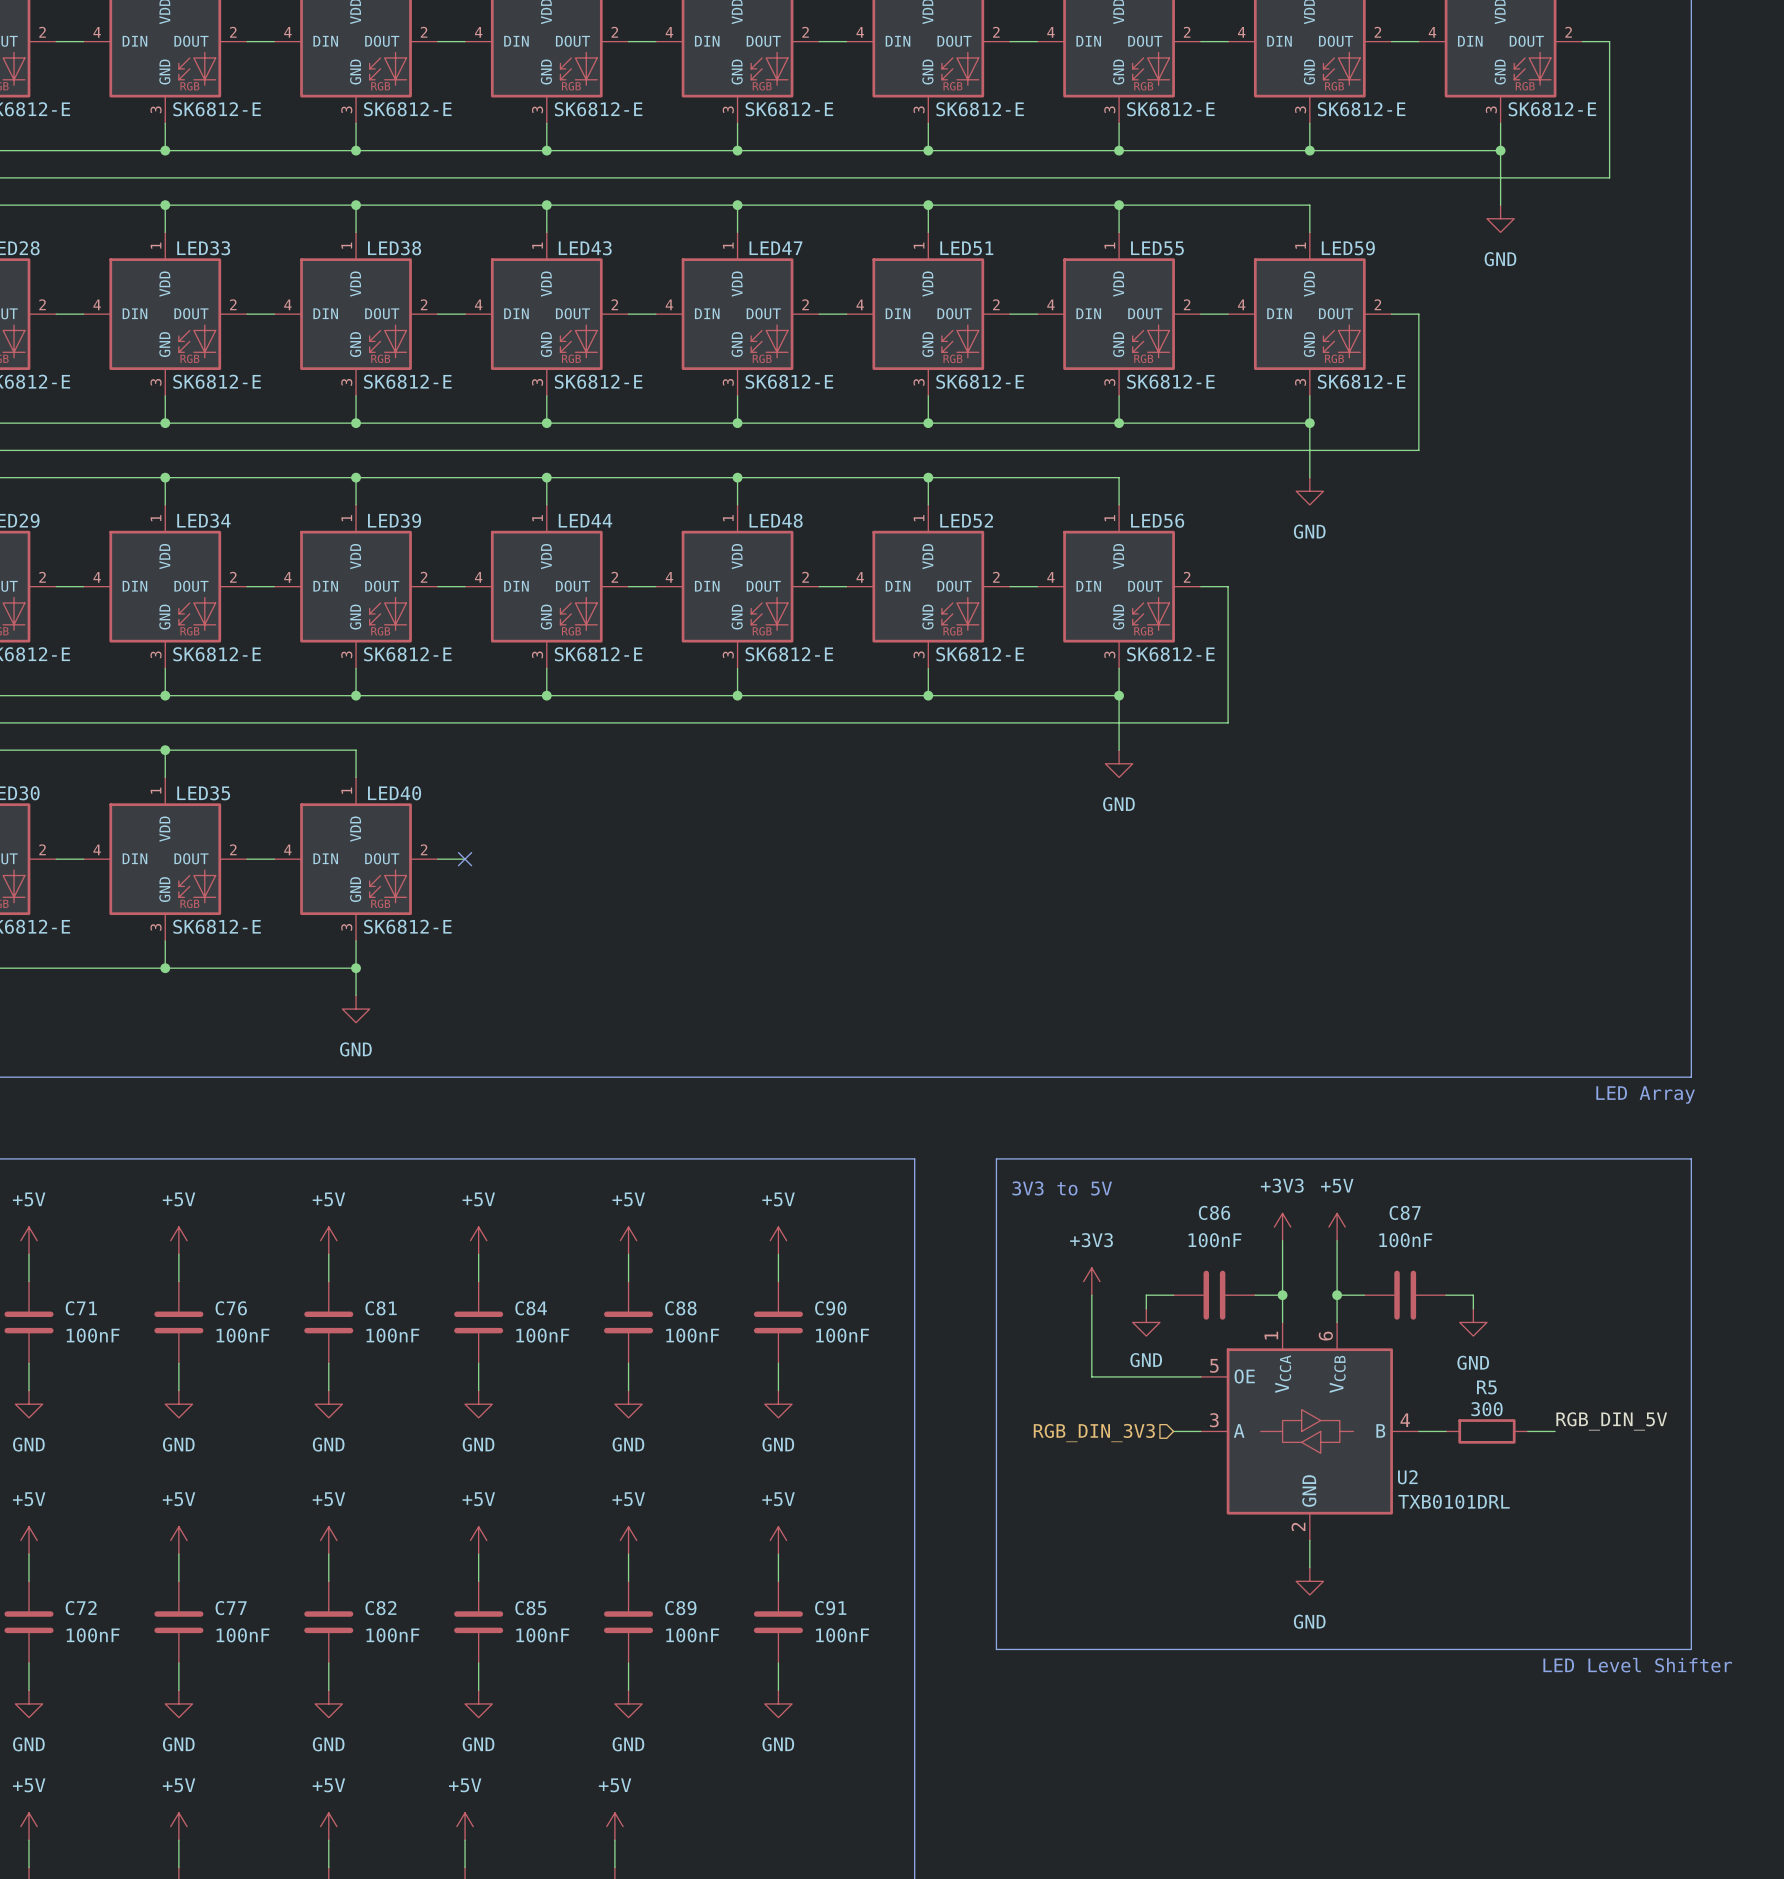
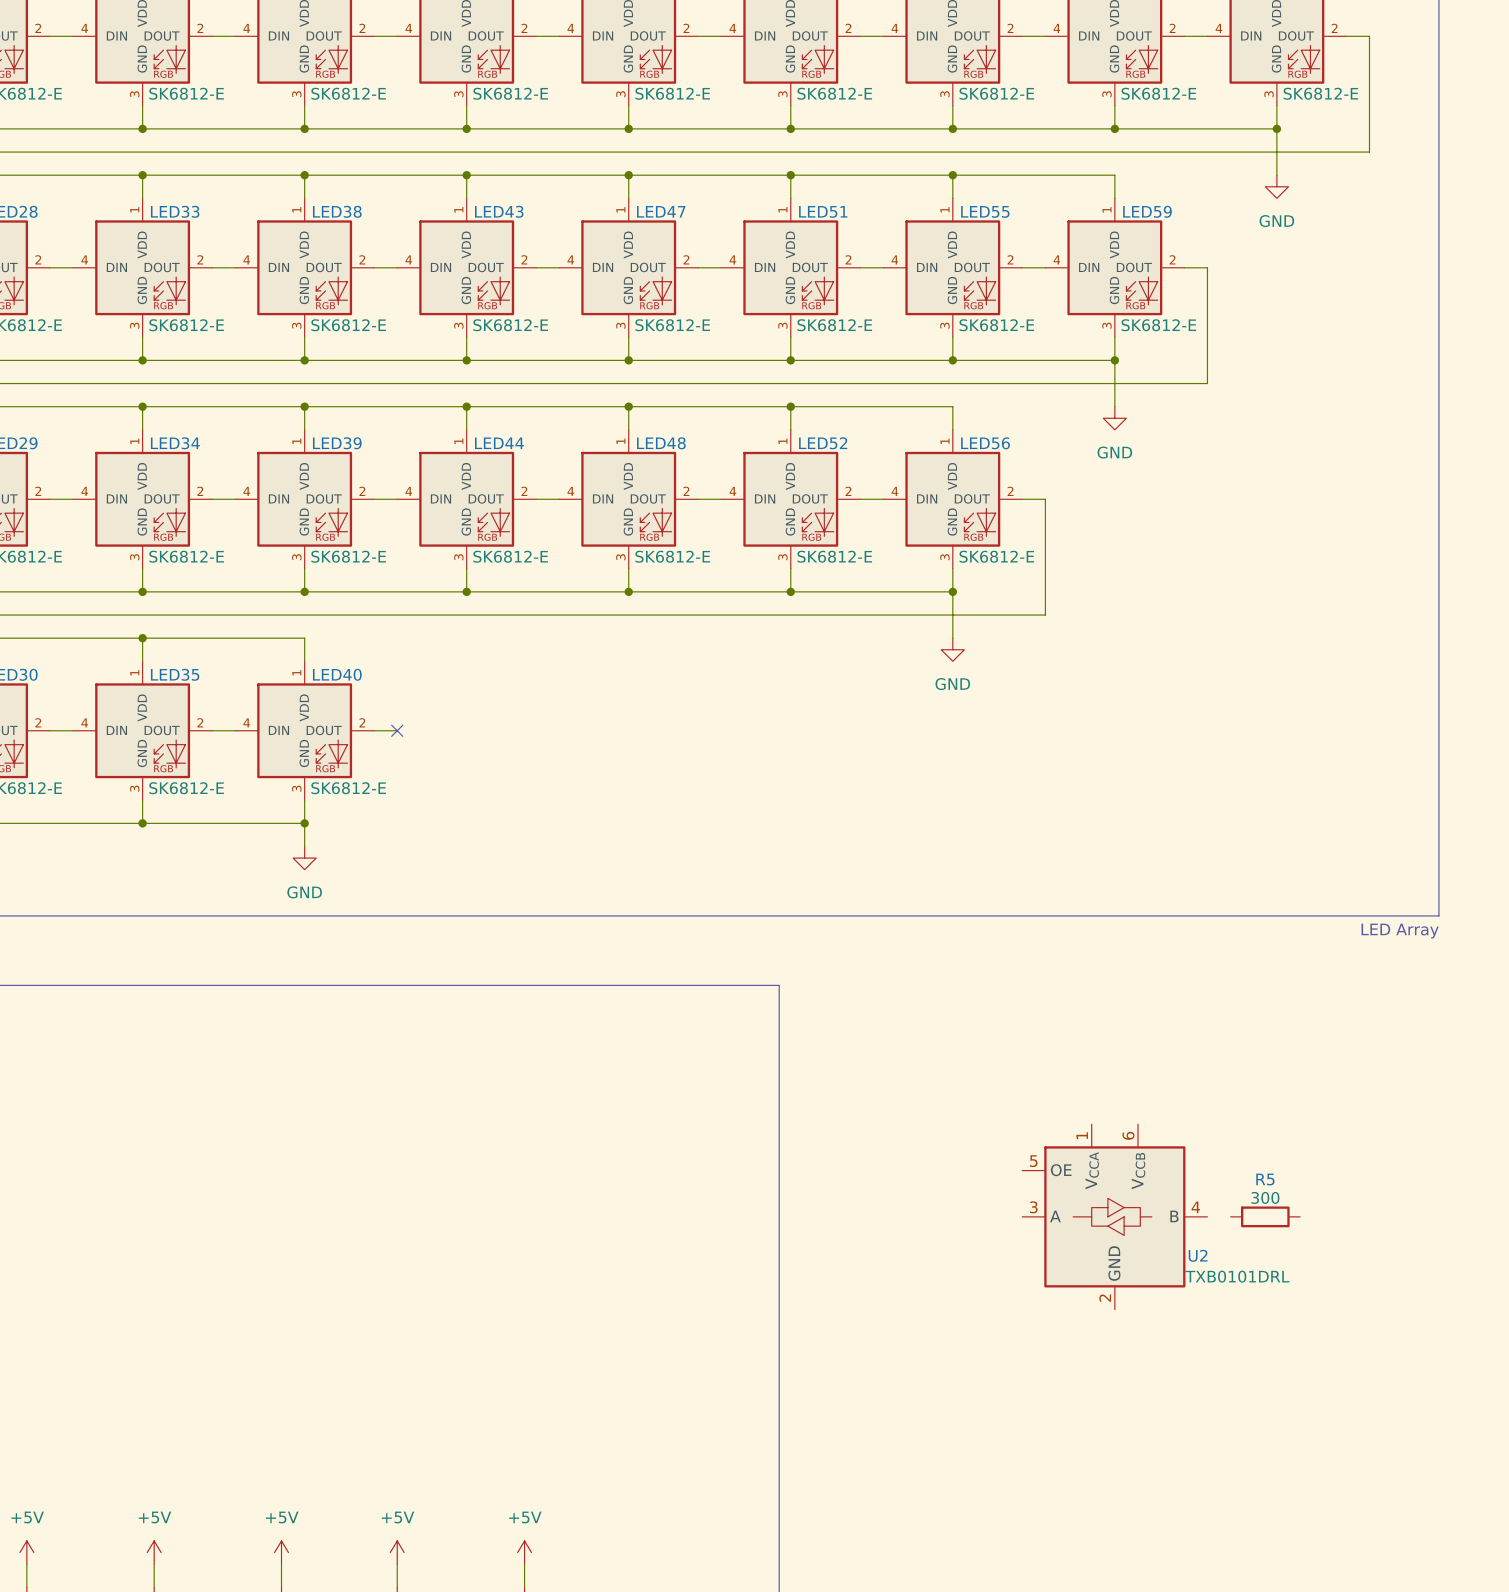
line: (996, 1158) (1691, 1158) (1691, 1649) (996, 1649) (996, 1158) -> none
text: 3V3 to 5V (1062, 1188) -> none
power symbol: +3V3 (1282, 1227) -> none
power symbol: +5V (1337, 1227) -> none
power symbol: +5V (29, 1240) -> none
power symbol: +5V (178, 1240) -> none
power symbol: +5V (328, 1240) -> none
power symbol: +5V (478, 1240) -> none
power symbol: +5V (628, 1240) -> none
power symbol: +5V (778, 1240) -> none
wire: (1282, 1240) (1282, 1322) -> none
wire: (1337, 1240) (1337, 1322) -> none
wire: (29, 1254) (29, 1281) -> none
wire: (178, 1254) (178, 1281) -> none
wire: (328, 1254) (328, 1281) -> none
wire: (478, 1254) (478, 1281) -> none
wire: (628, 1254) (628, 1281) -> none
wire: (778, 1254) (778, 1281) -> none
power symbol: +3V3 (1091, 1281) -> none
wire: (1091, 1295) (1091, 1376) (1200, 1376) -> none
wire: (1173, 1295) (1146, 1295) (1146, 1308) -> none
C86: 100nF (1214, 1295) -> none
wire: (1255, 1295) (1282, 1295) -> none
junction: (1282, 1295) -> none
wire: (1337, 1295) (1364, 1295) -> none
junction: (1337, 1295) -> none
C87: 100nF (1405, 1295) -> none
wire: (1446, 1295) (1473, 1295) (1473, 1308) -> none
C71: 100nF (29, 1322) -> none
C76: 100nF (178, 1322) -> none
C81: 100nF (328, 1322) -> none
C84: 100nF (478, 1322) -> none
C88: 100nF (628, 1322) -> none
C90: 100nF (778, 1322) -> none
power symbol: GND (1146, 1322) -> none
power symbol: GND (1473, 1322) -> none
wire: (29, 1363) (29, 1390) -> none
wire: (178, 1363) (178, 1390) -> none
wire: (328, 1363) (328, 1390) -> none
wire: (478, 1363) (478, 1390) -> none
wire: (628, 1363) (628, 1390) -> none
wire: (778, 1363) (778, 1390) -> none
power symbol: GND (29, 1404) -> none
power symbol: GND (178, 1404) -> none
power symbol: GND (328, 1404) -> none
power symbol: GND (478, 1404) -> none
power symbol: GND (628, 1404) -> none
power symbol: GND (778, 1404) -> none
label: RGB_DIN_5V (1611, 1421) -> none
wire: (1173, 1431) (1200, 1431) -> none
wire: (1418, 1431) (1446, 1431) -> none
wire: (1527, 1431) (1555, 1431) -> none
hierarchical label: RGB_DIN_3V3 (1094, 1433) -> none
power symbol: +5V (29, 1540) -> none
power symbol: +5V (178, 1540) -> none
power symbol: +5V (328, 1540) -> none
power symbol: +5V (478, 1540) -> none
power symbol: +5V (628, 1540) -> none
power symbol: +5V (778, 1540) -> none
wire: (1309, 1540) (1309, 1567) -> none
wire: (29, 1554) (29, 1581) -> none
wire: (178, 1554) (178, 1581) -> none
wire: (328, 1554) (328, 1581) -> none
wire: (478, 1554) (478, 1581) -> none
wire: (628, 1554) (628, 1581) -> none
wire: (778, 1554) (778, 1581) -> none
power symbol: GND (1309, 1581) -> none
C72: 100nF (29, 1622) -> none
C77: 100nF (178, 1622) -> none
C82: 100nF (328, 1622) -> none
C85: 100nF (478, 1622) -> none
C89: 100nF (628, 1622) -> none
C91: 100nF (778, 1622) -> none
wire: (29, 1663) (29, 1690) -> none
wire: (178, 1663) (178, 1690) -> none
wire: (328, 1663) (328, 1690) -> none
wire: (478, 1663) (478, 1690) -> none
wire: (628, 1663) (628, 1690) -> none
wire: (778, 1663) (778, 1690) -> none
text: LED Level Shifter (1637, 1665) -> none
power symbol: GND (29, 1703) -> none
power symbol: GND (178, 1703) -> none
power symbol: GND (328, 1703) -> none
power symbol: GND (478, 1703) -> none
power symbol: GND (628, 1703) -> none
power symbol: GND (778, 1703) -> none

